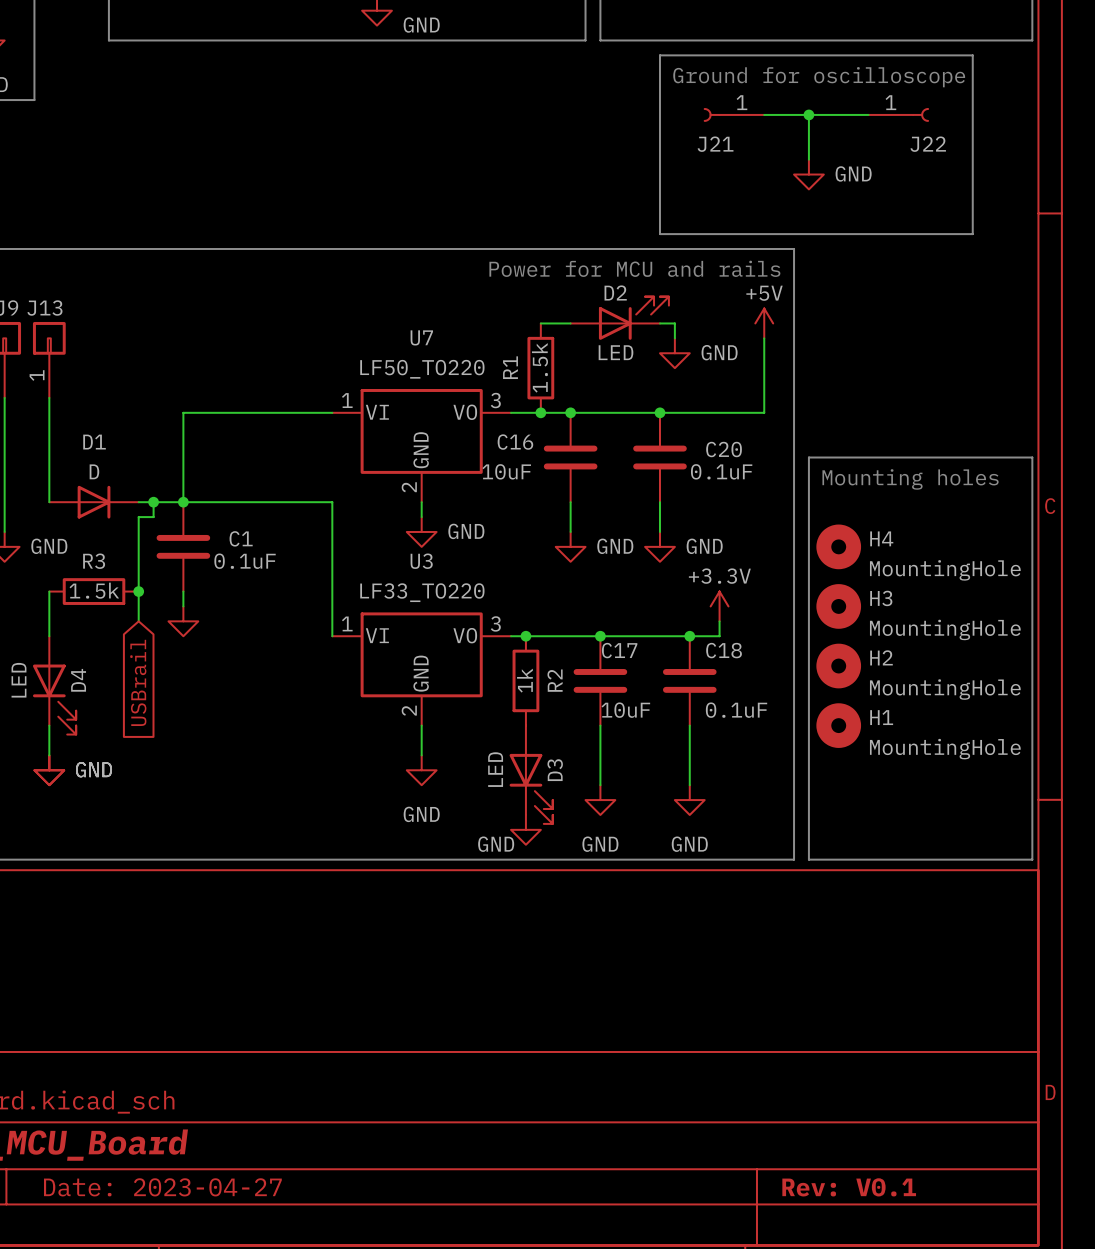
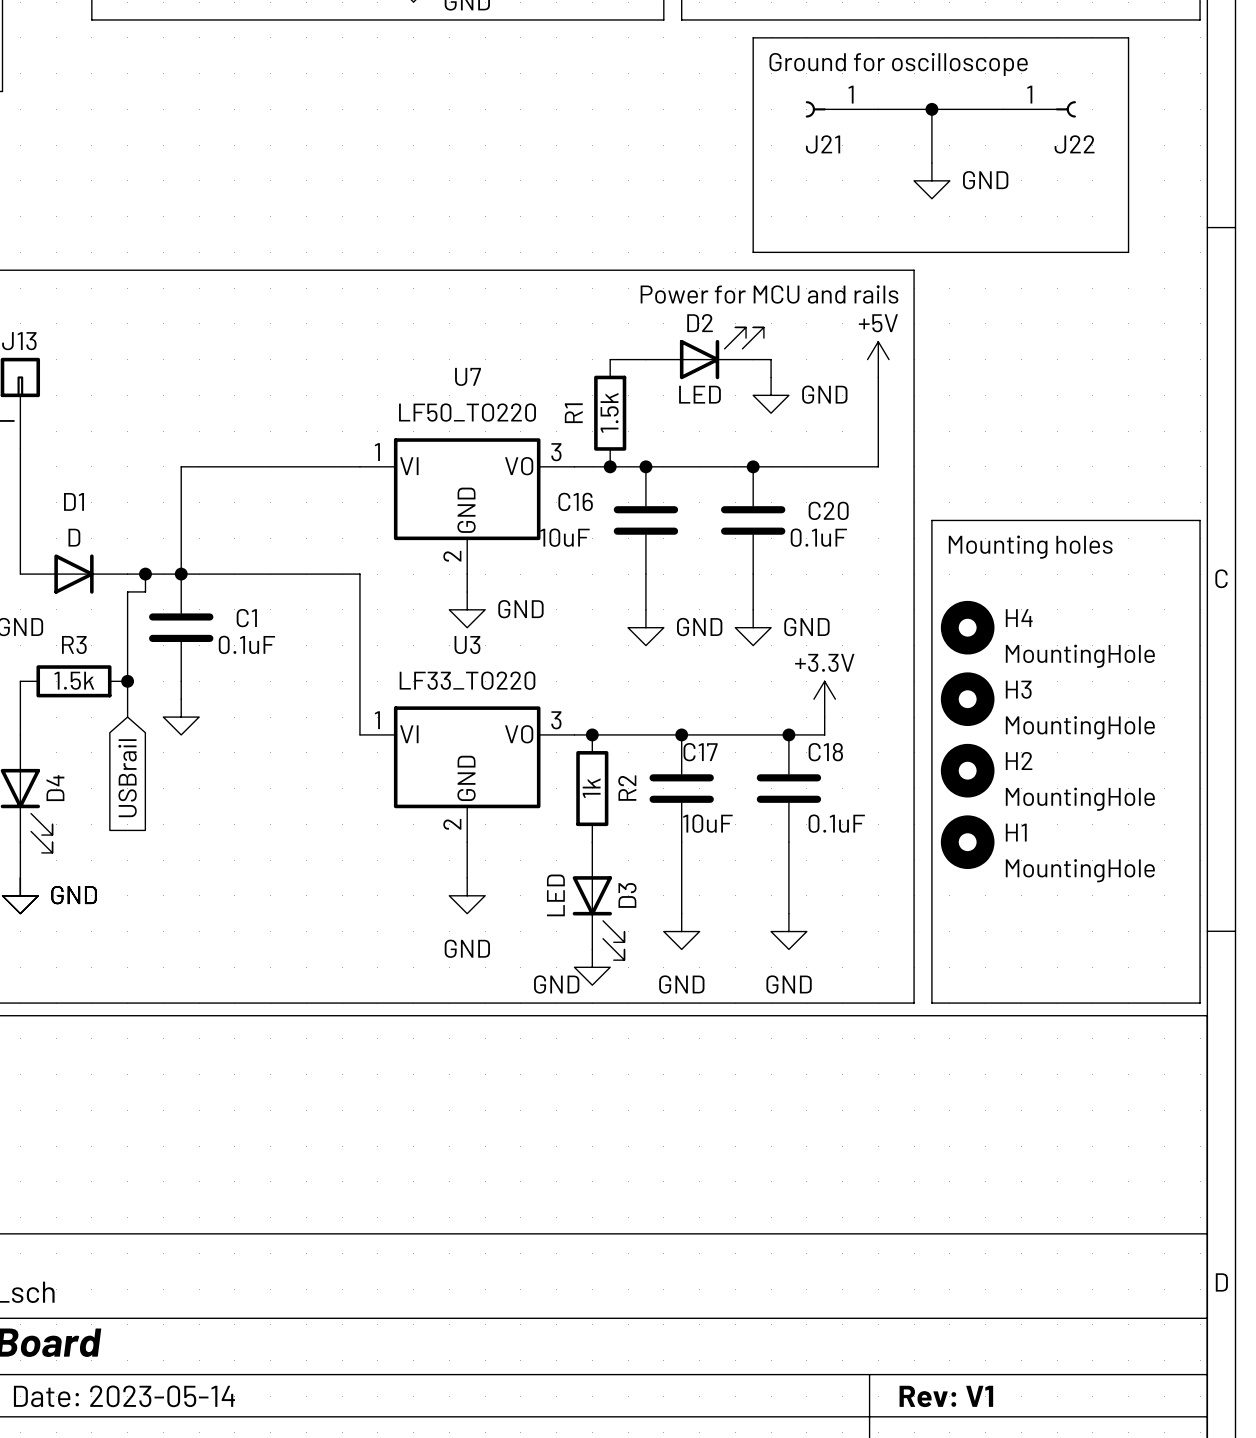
title block: Date: 2023-04-27 (162, 1187) -> Date: 2023-05-14 (124, 1396)
title block: Rev: V0.1 (849, 1187) -> Rev: V1 (946, 1396)

